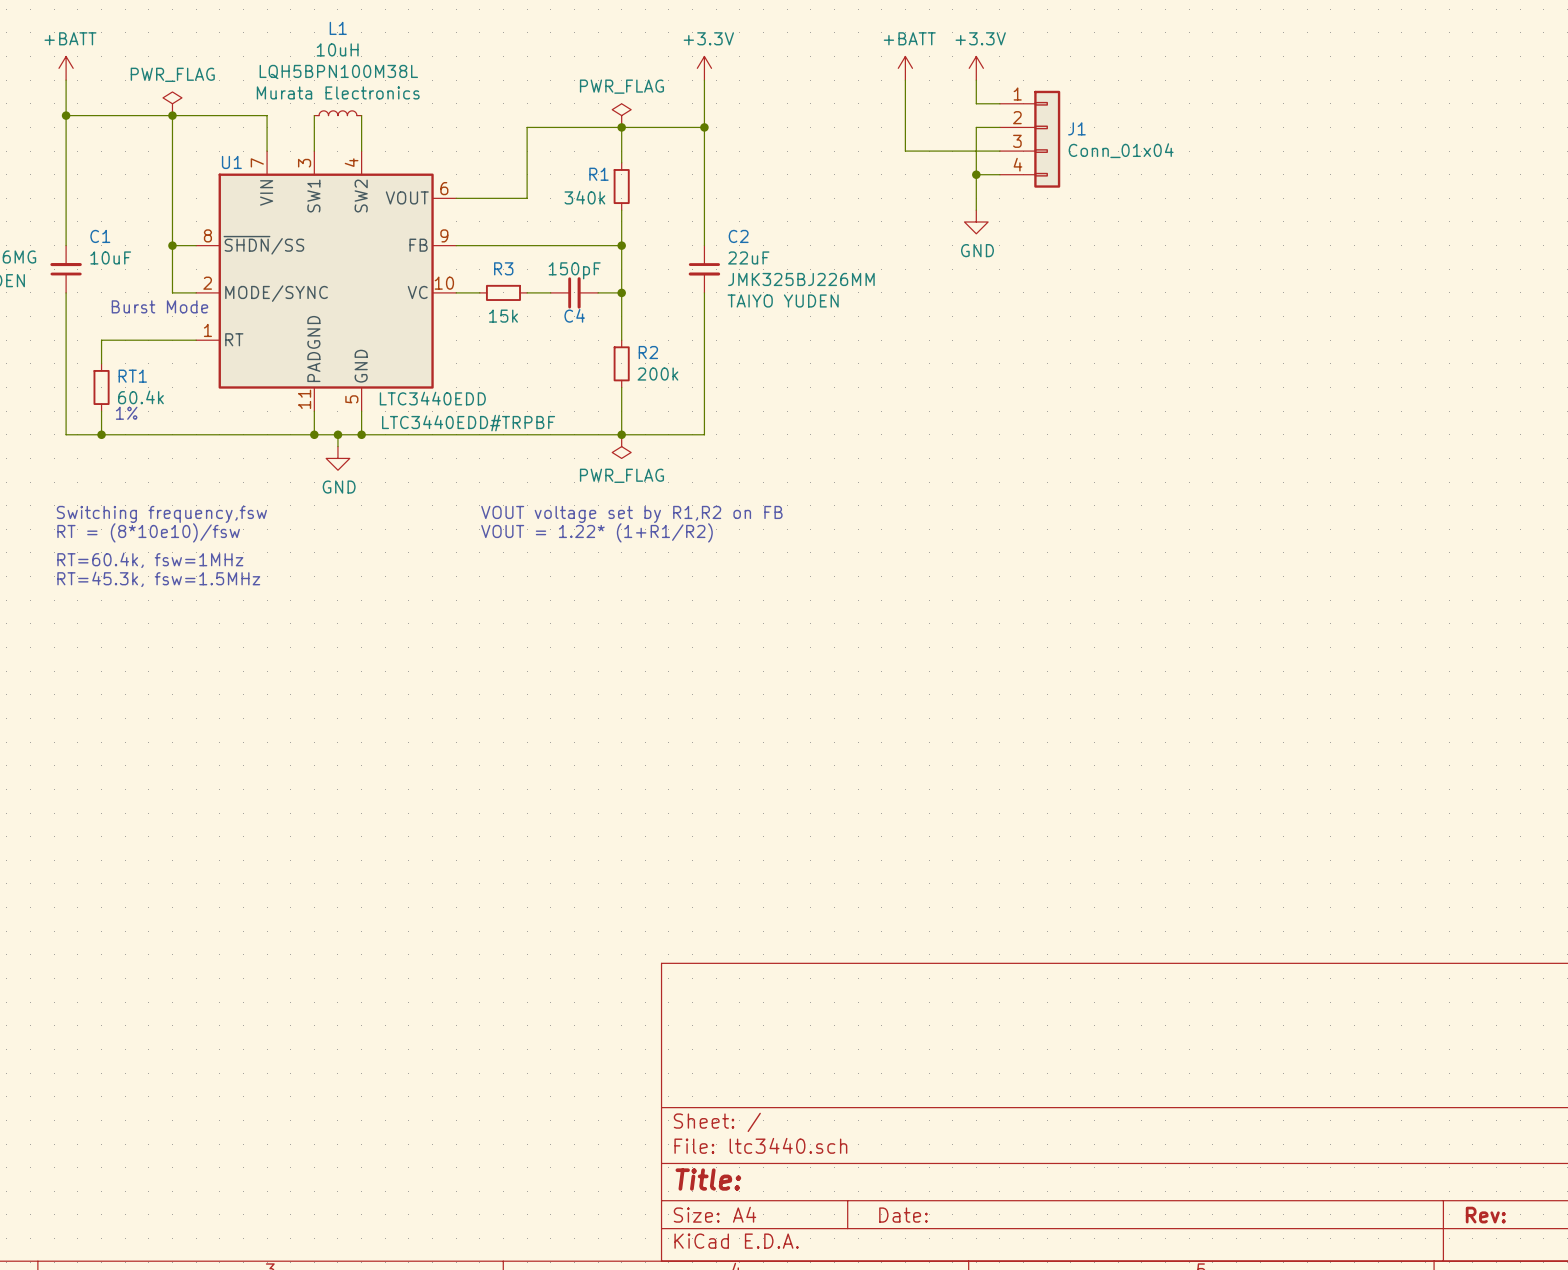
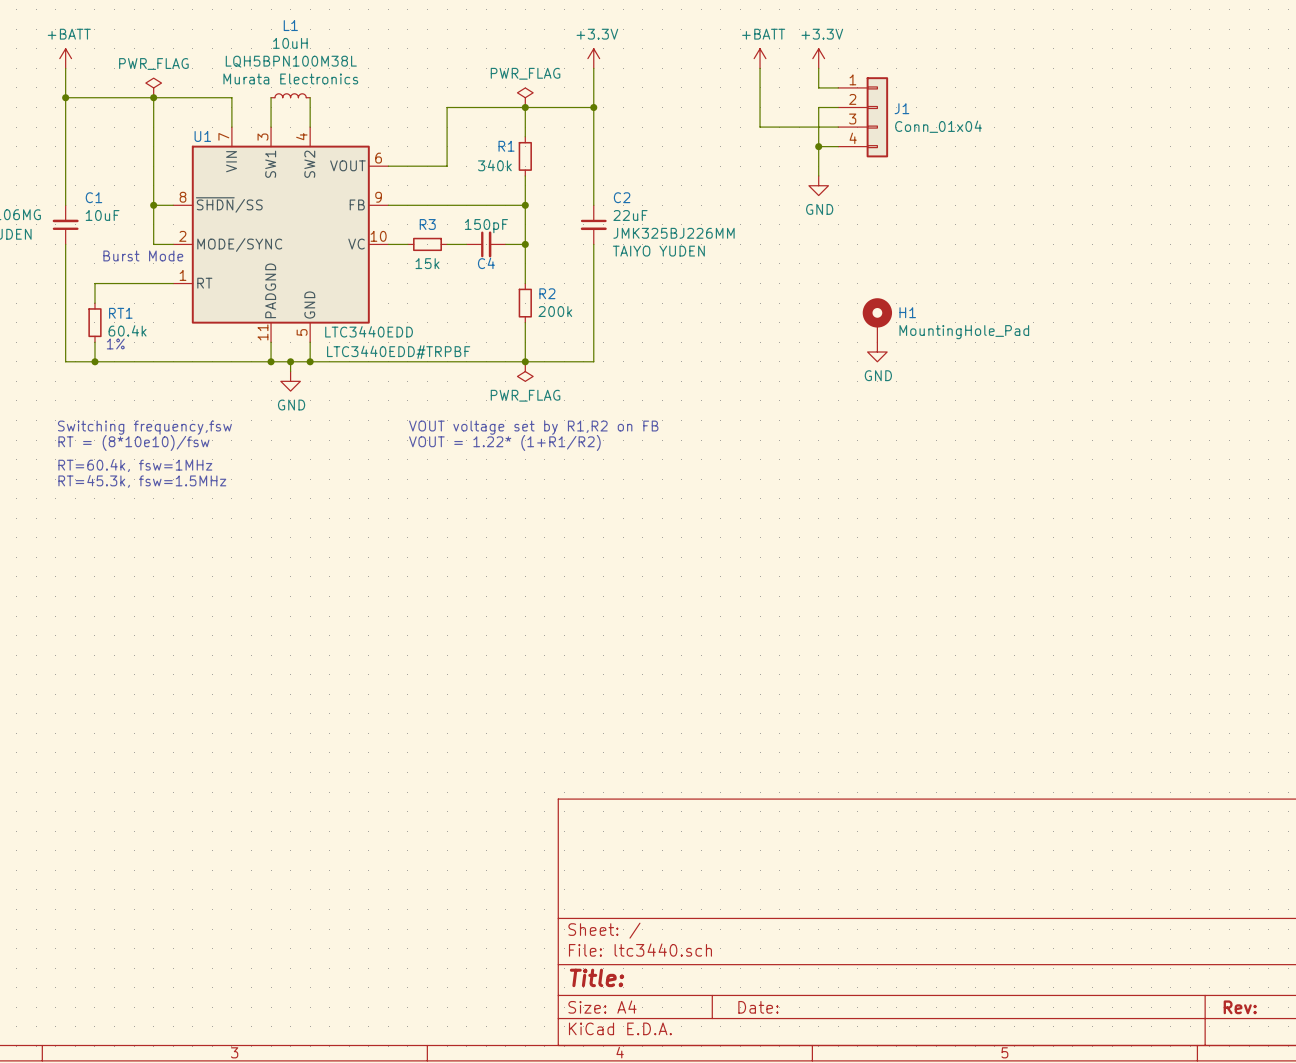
H1: none -> MountingHole_Pad (877, 320)
power symbol: none -> GND (877, 352)

